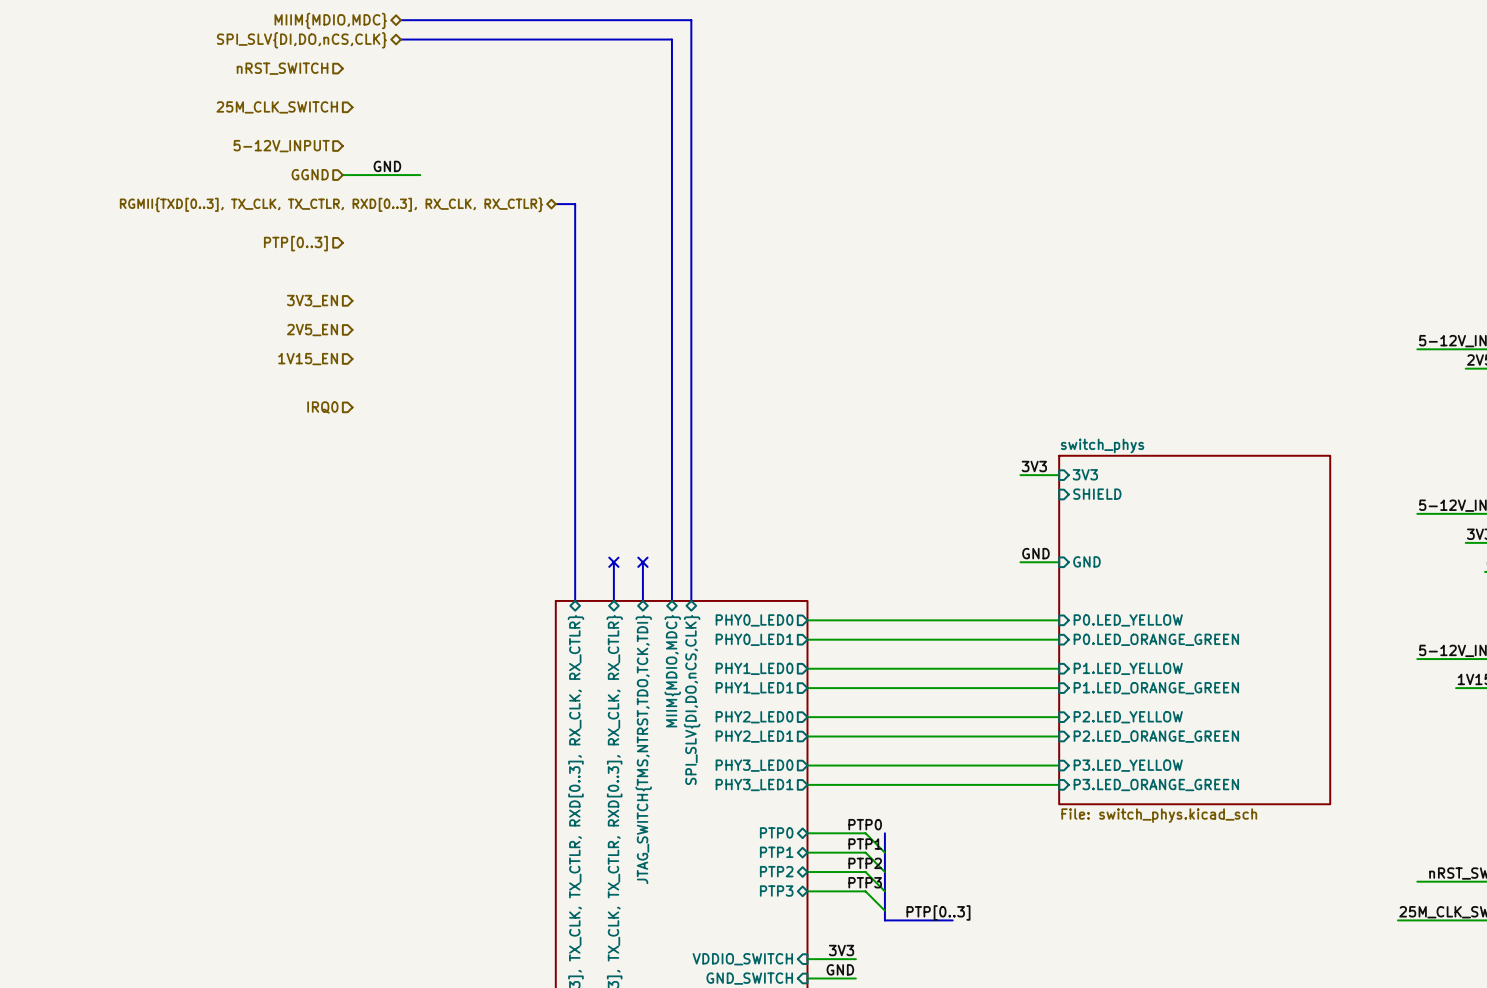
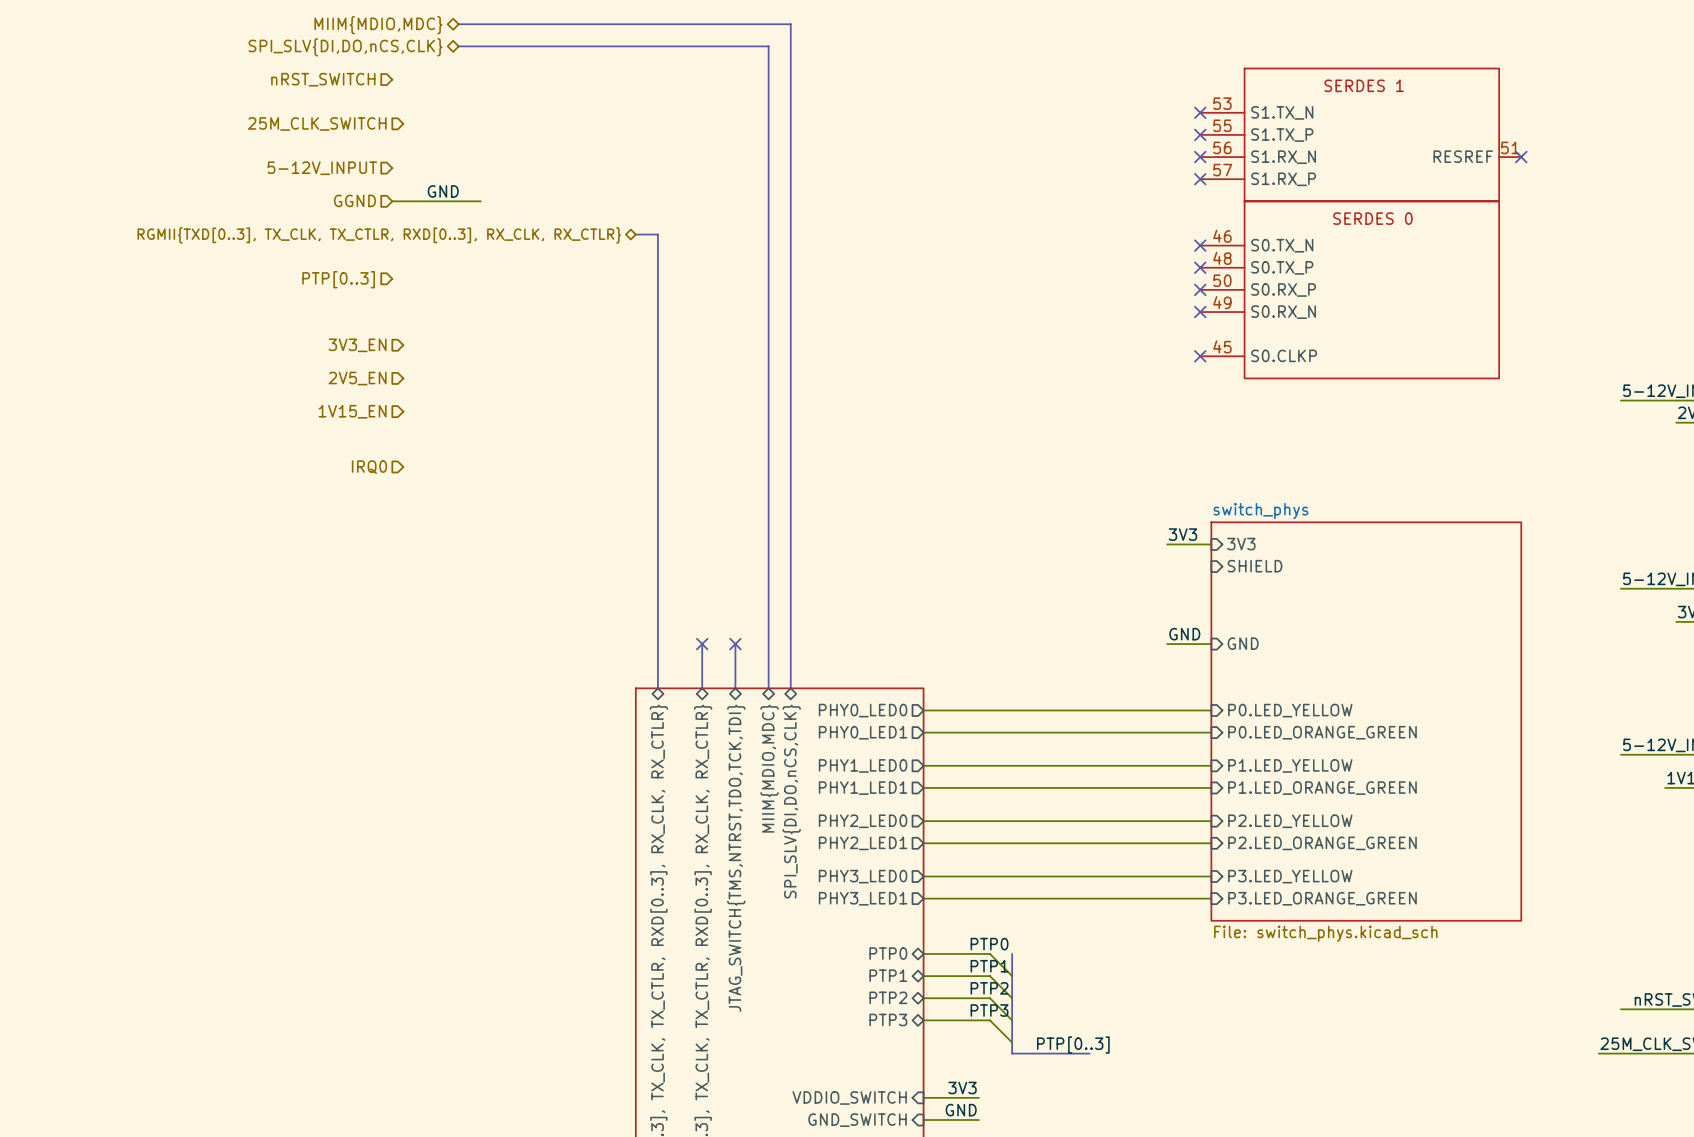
no-connect mark: none -> (1200, 112)
no-connect mark: none -> (1200, 134)
no-connect mark: none -> (1200, 157)
no-connect mark: none -> (1521, 157)
no-connect mark: none -> (1200, 179)
part: none -> (1360, 223)
no-connect mark: none -> (1200, 245)
no-connect mark: none -> (1200, 267)
no-connect mark: none -> (1200, 289)
no-connect mark: none -> (1200, 312)
no-connect mark: none -> (1200, 356)

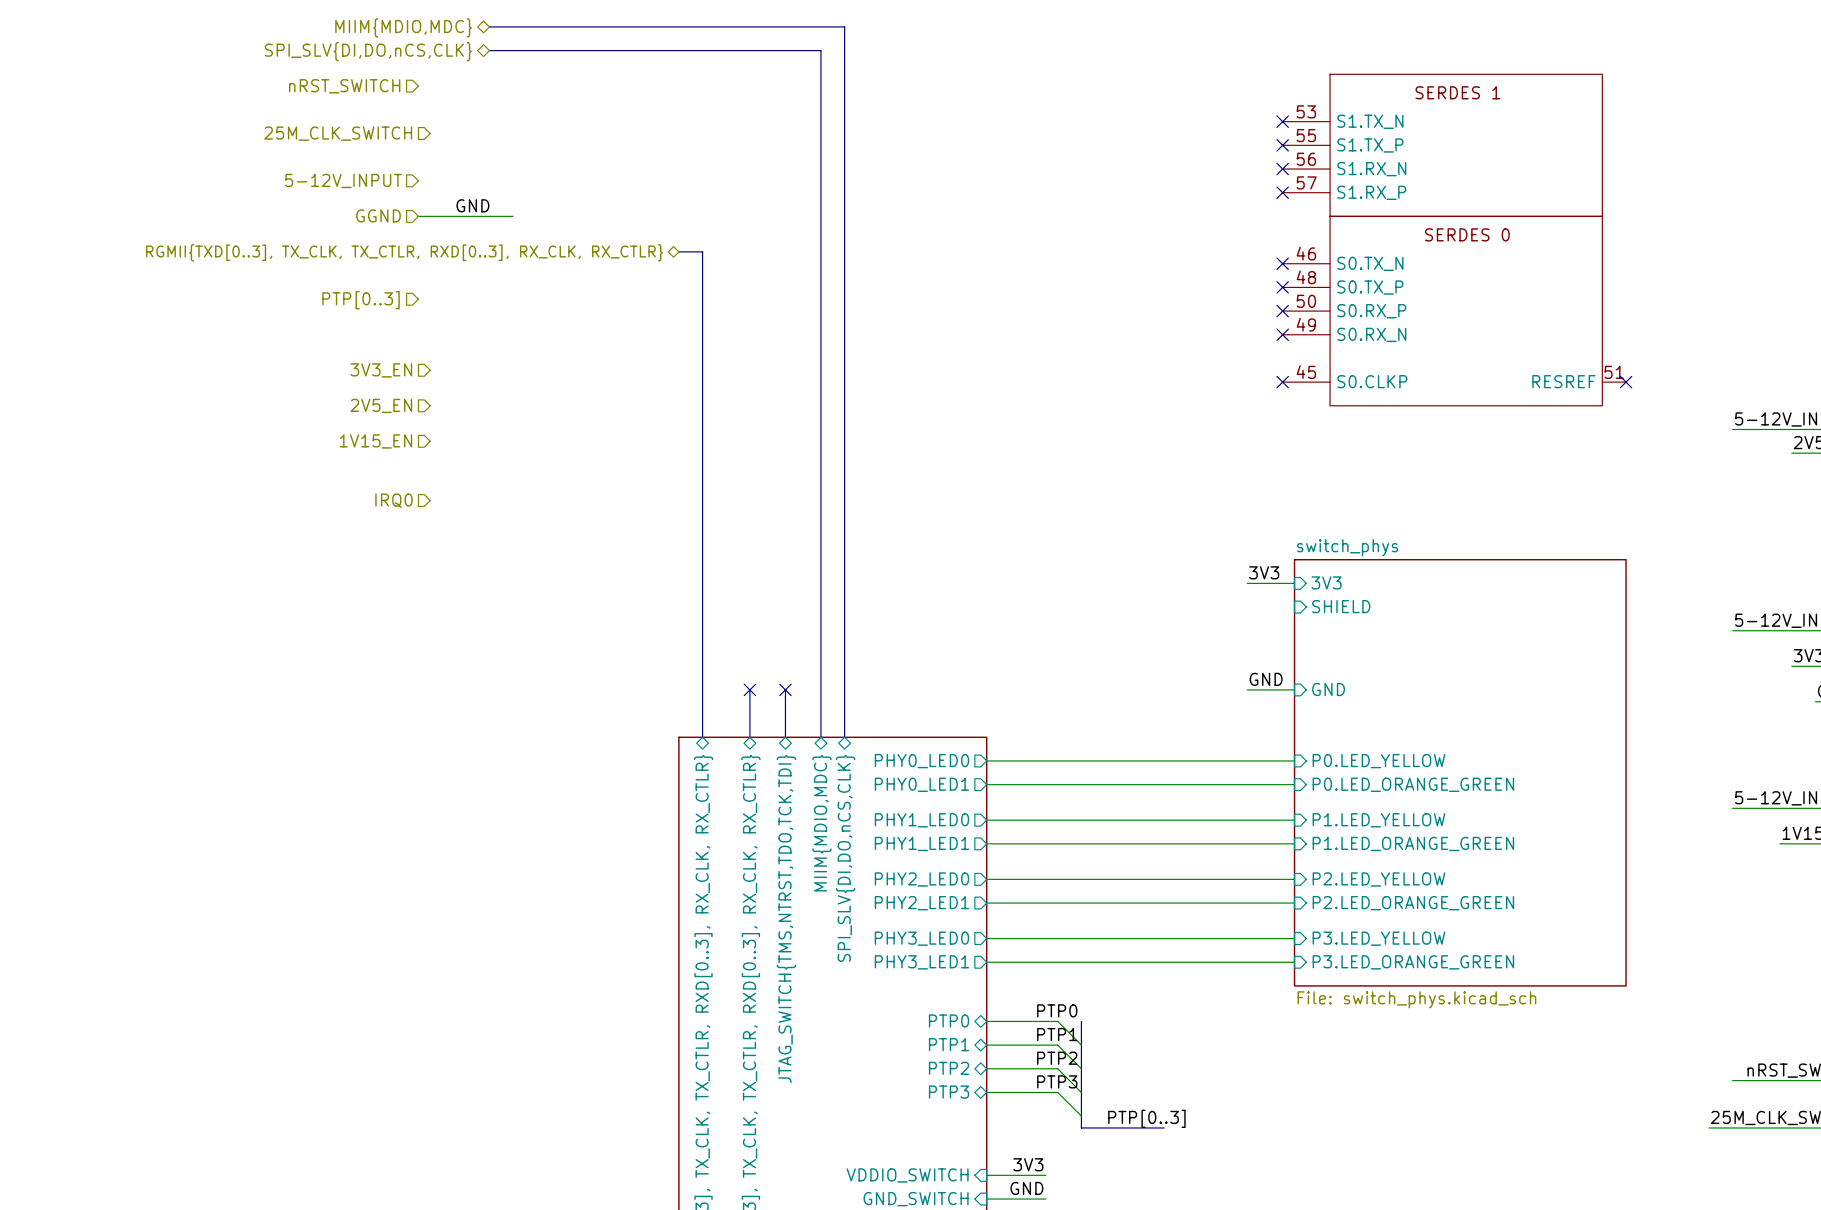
part symbol: [1200, 68, 1522, 379] -> [1282, 74, 1627, 406]
no-connect mark: (1521, 157) -> none
no-connect mark: none -> (1626, 382)

